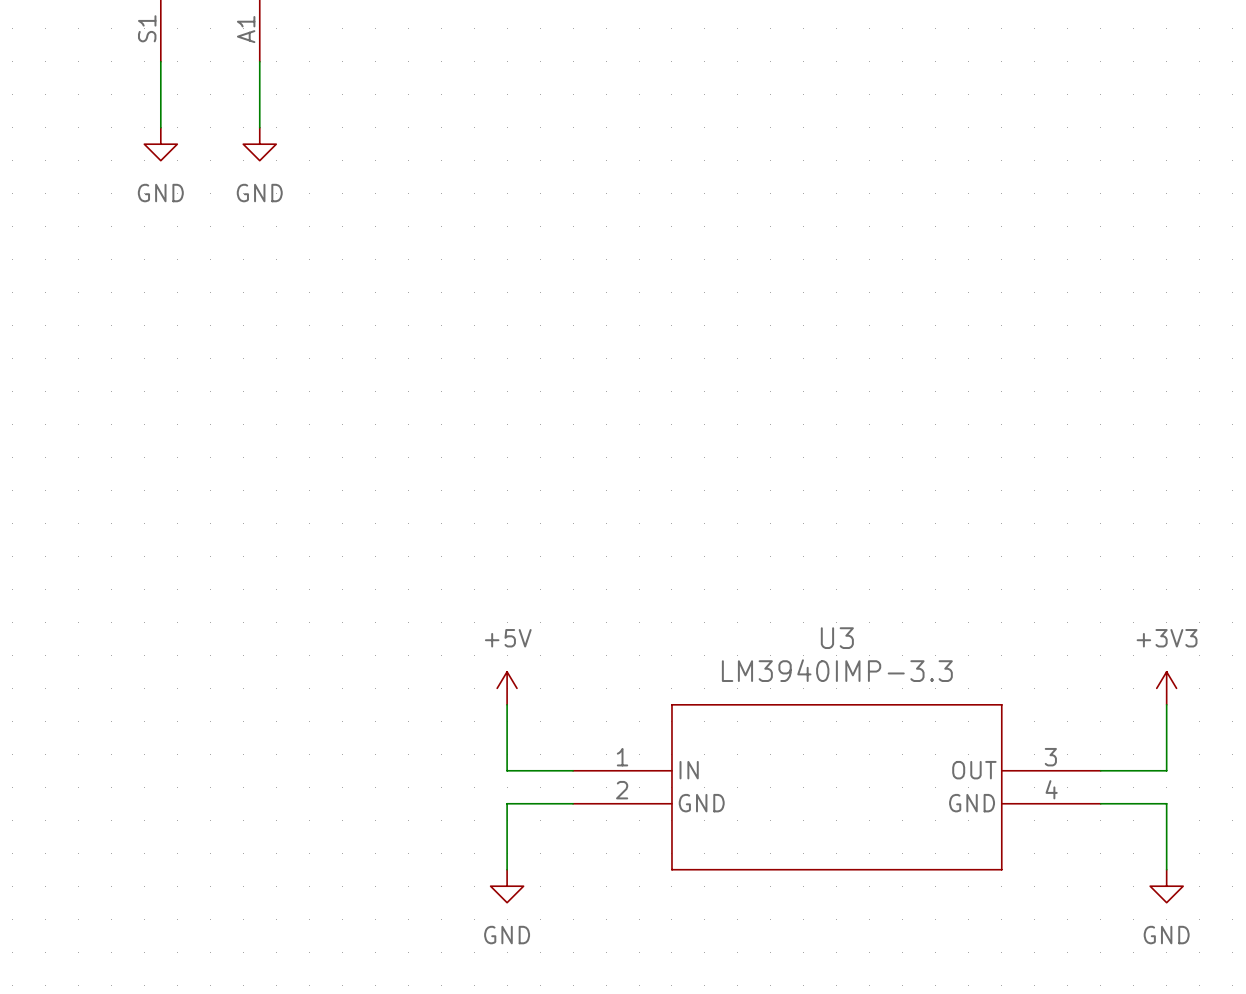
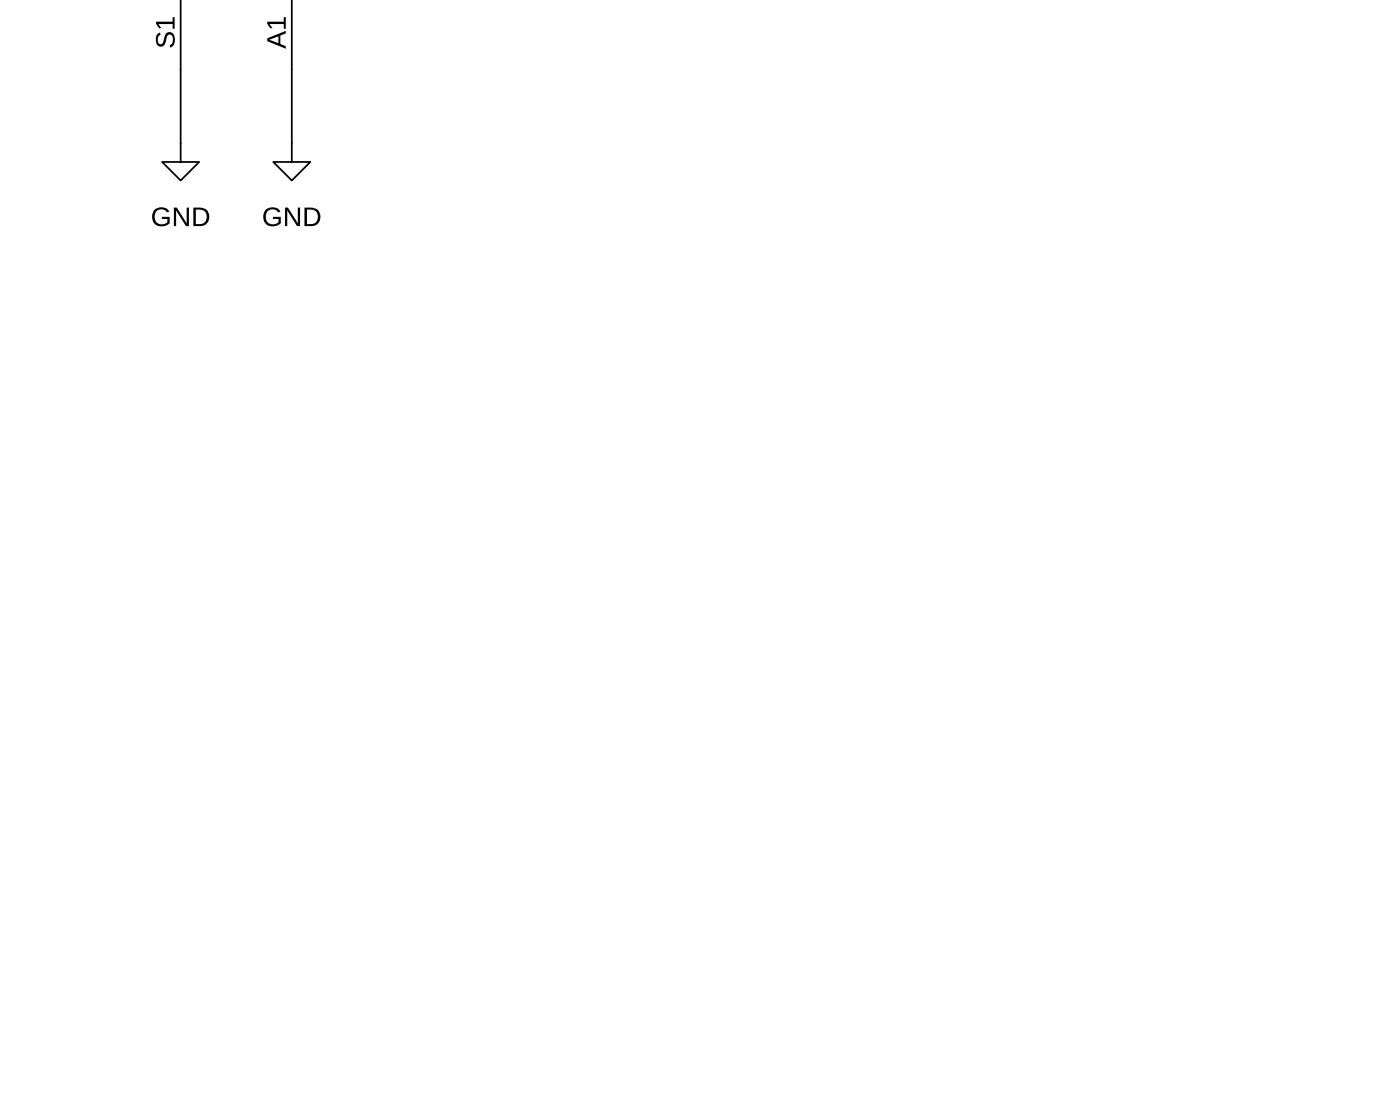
power symbol: +5V (507, 688) -> none
power symbol: +3V3 (1166, 688) -> none
wire: (507, 704) (507, 770) (573, 770) -> none
wire: (1166, 704) (1166, 770) (1100, 770) -> none
U3: LM3940IMP-3.3 (836, 787) -> none
wire: (573, 803) (507, 803) (507, 869) -> none
wire: (1100, 803) (1166, 803) (1166, 869) -> none
power symbol: GND (507, 886) -> none
power symbol: GND (1166, 886) -> none

